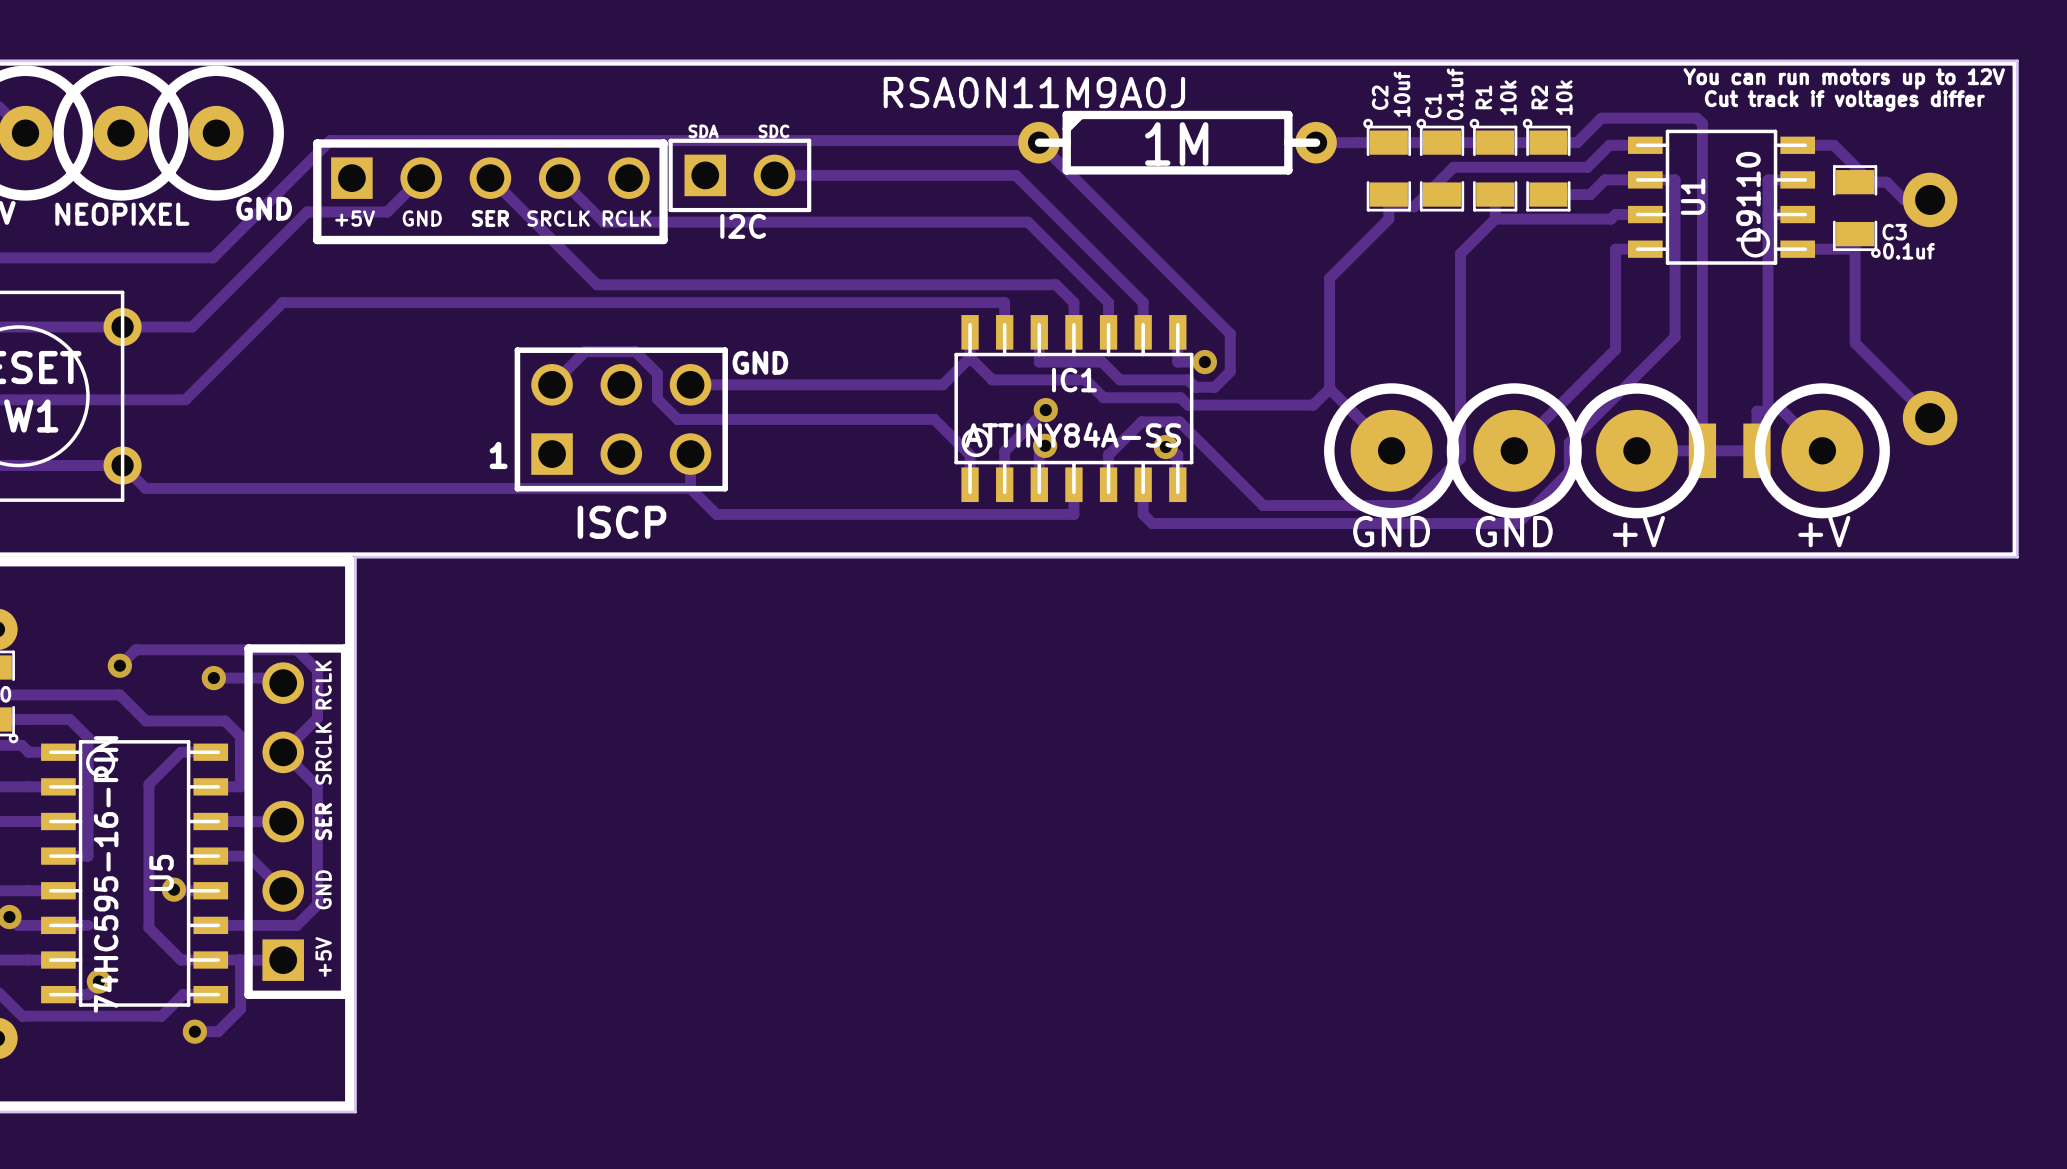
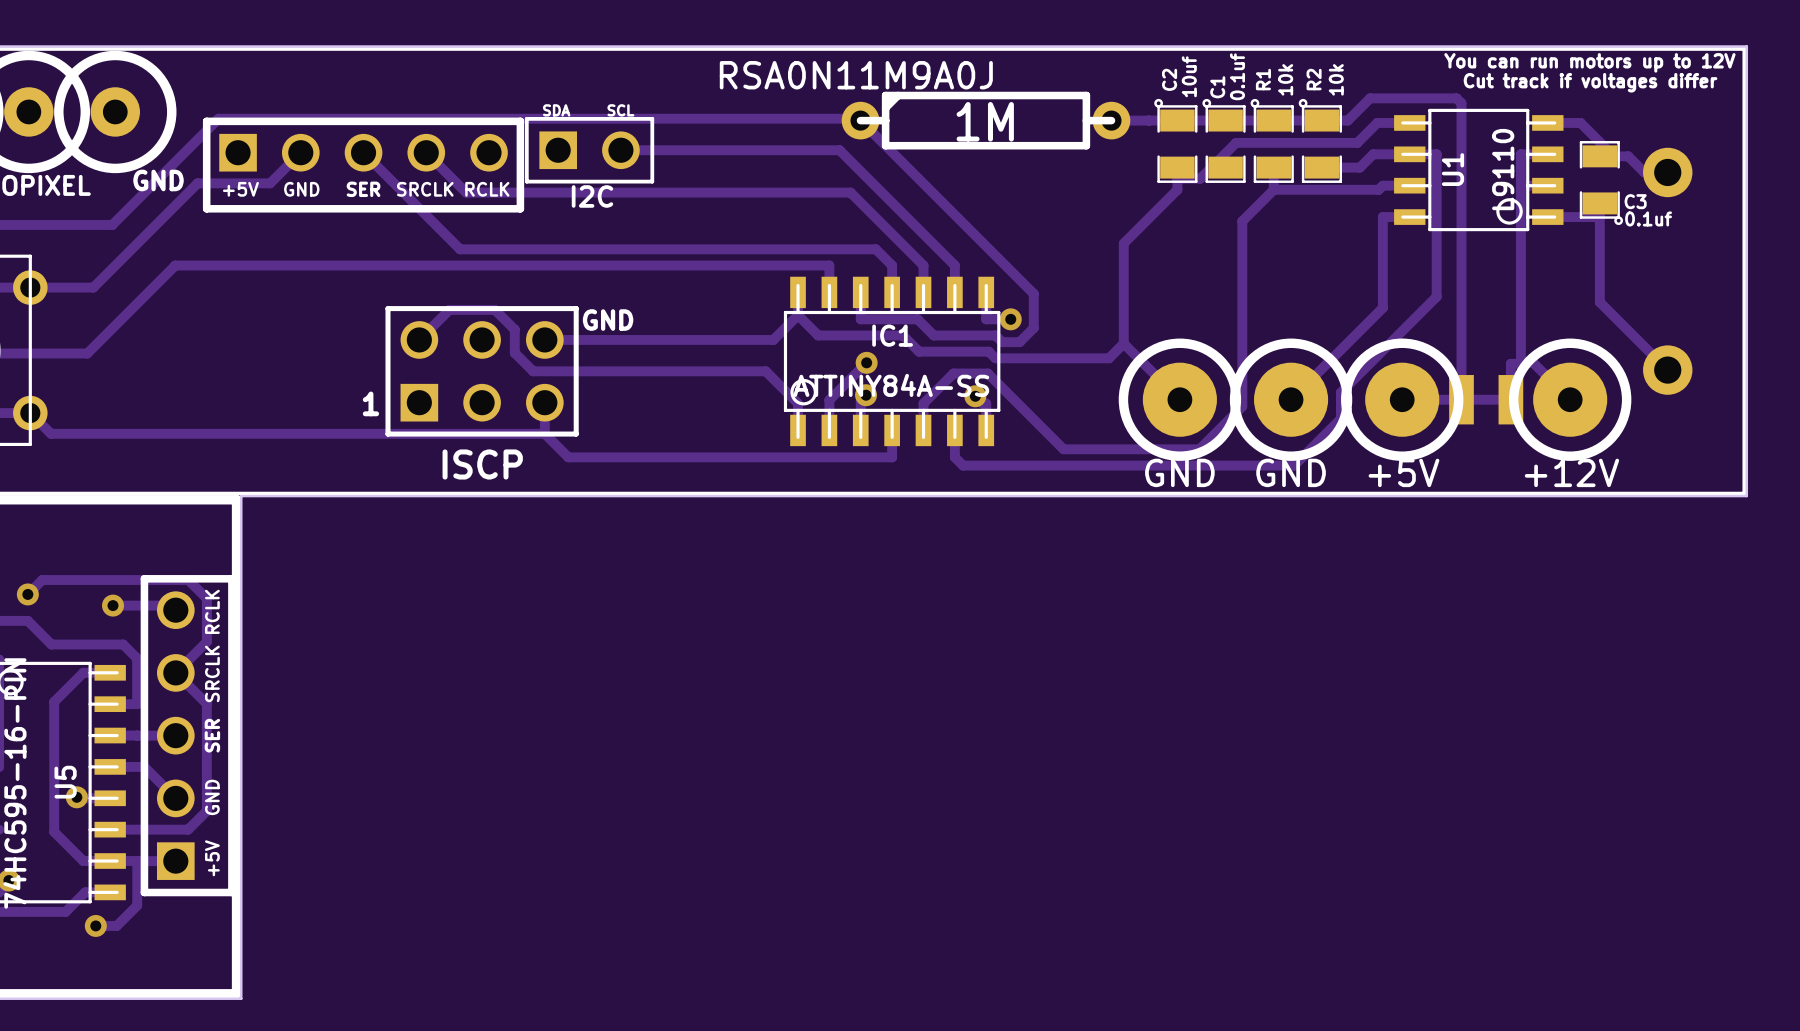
text: SDC (774, 131) -> SCL (620, 110)
part value: +V (1638, 531) -> +5V (1403, 472)
part value: +V (1824, 531) -> +12V (1571, 472)

